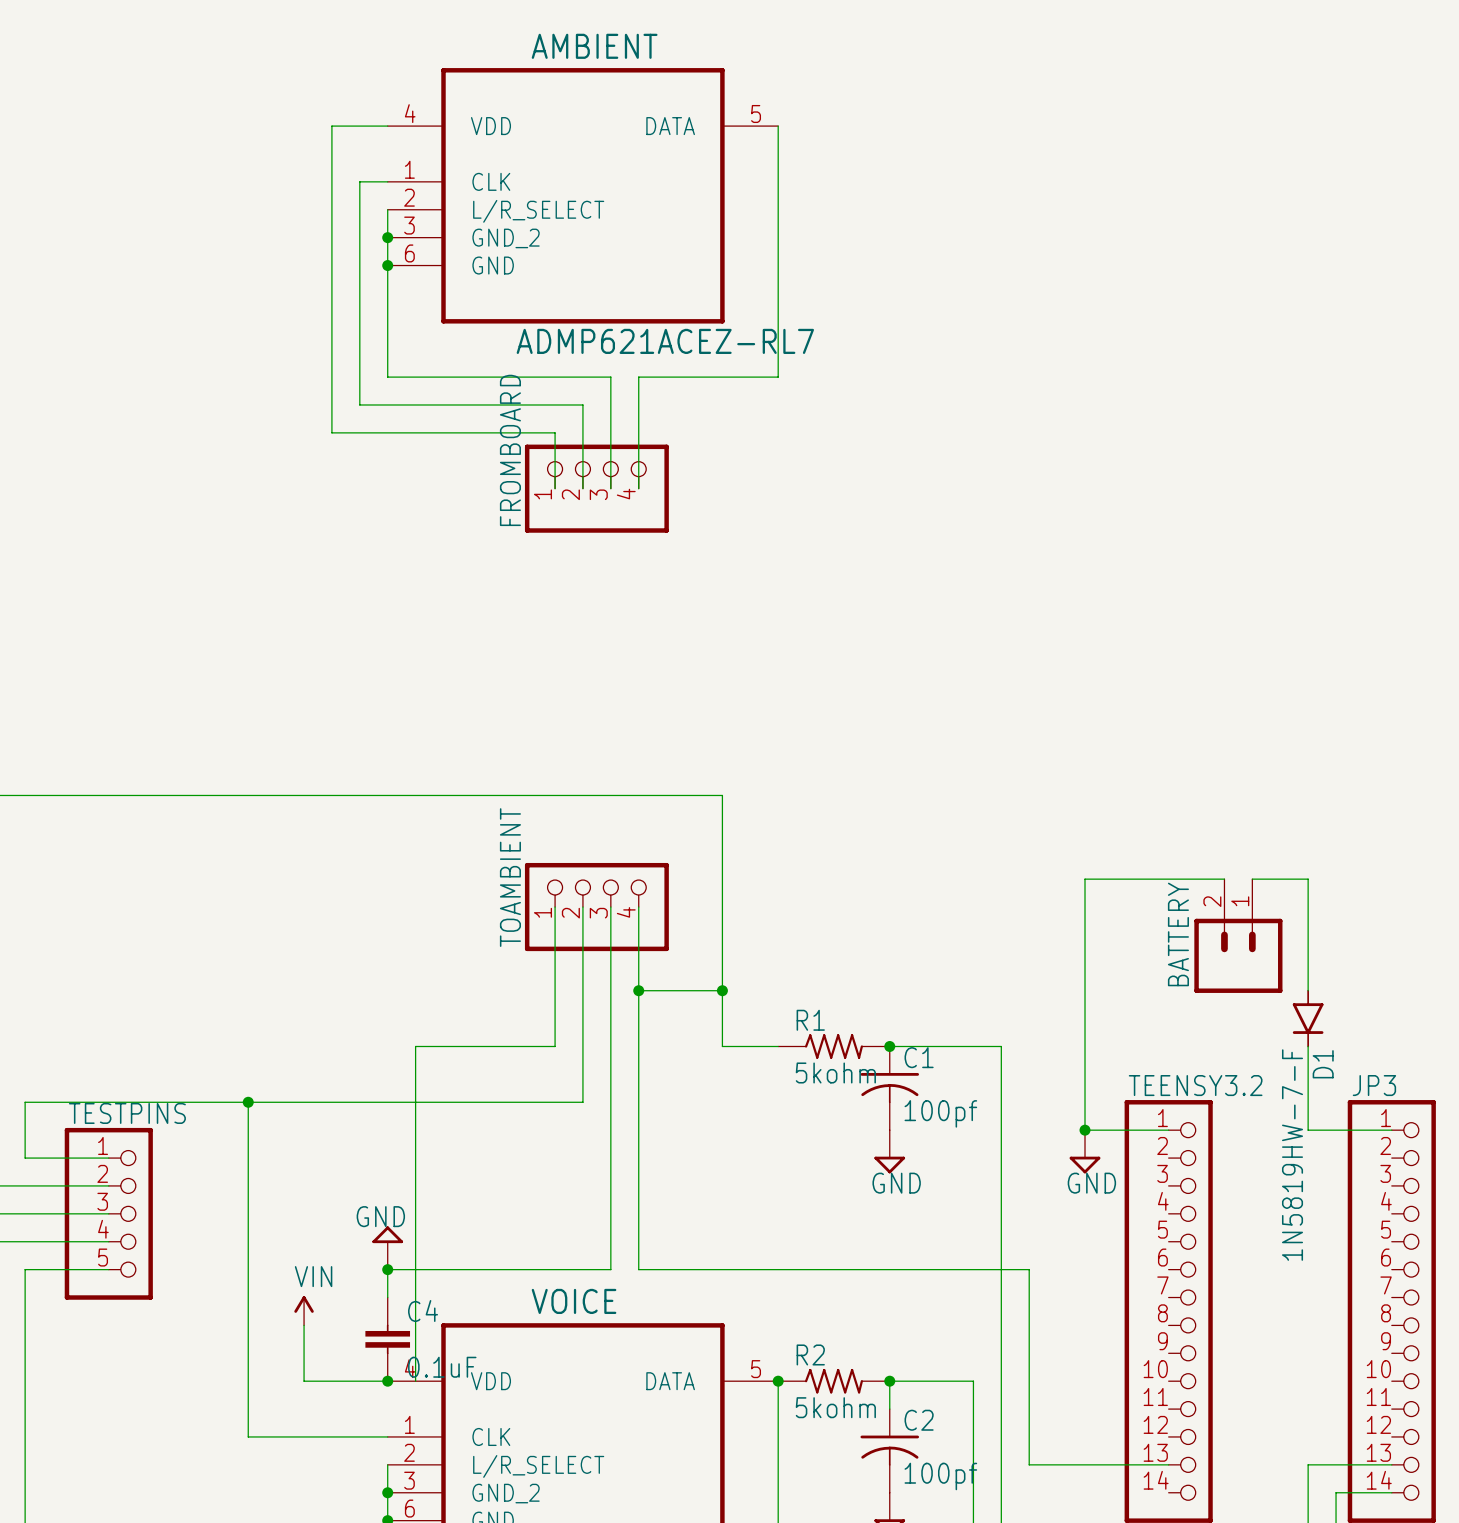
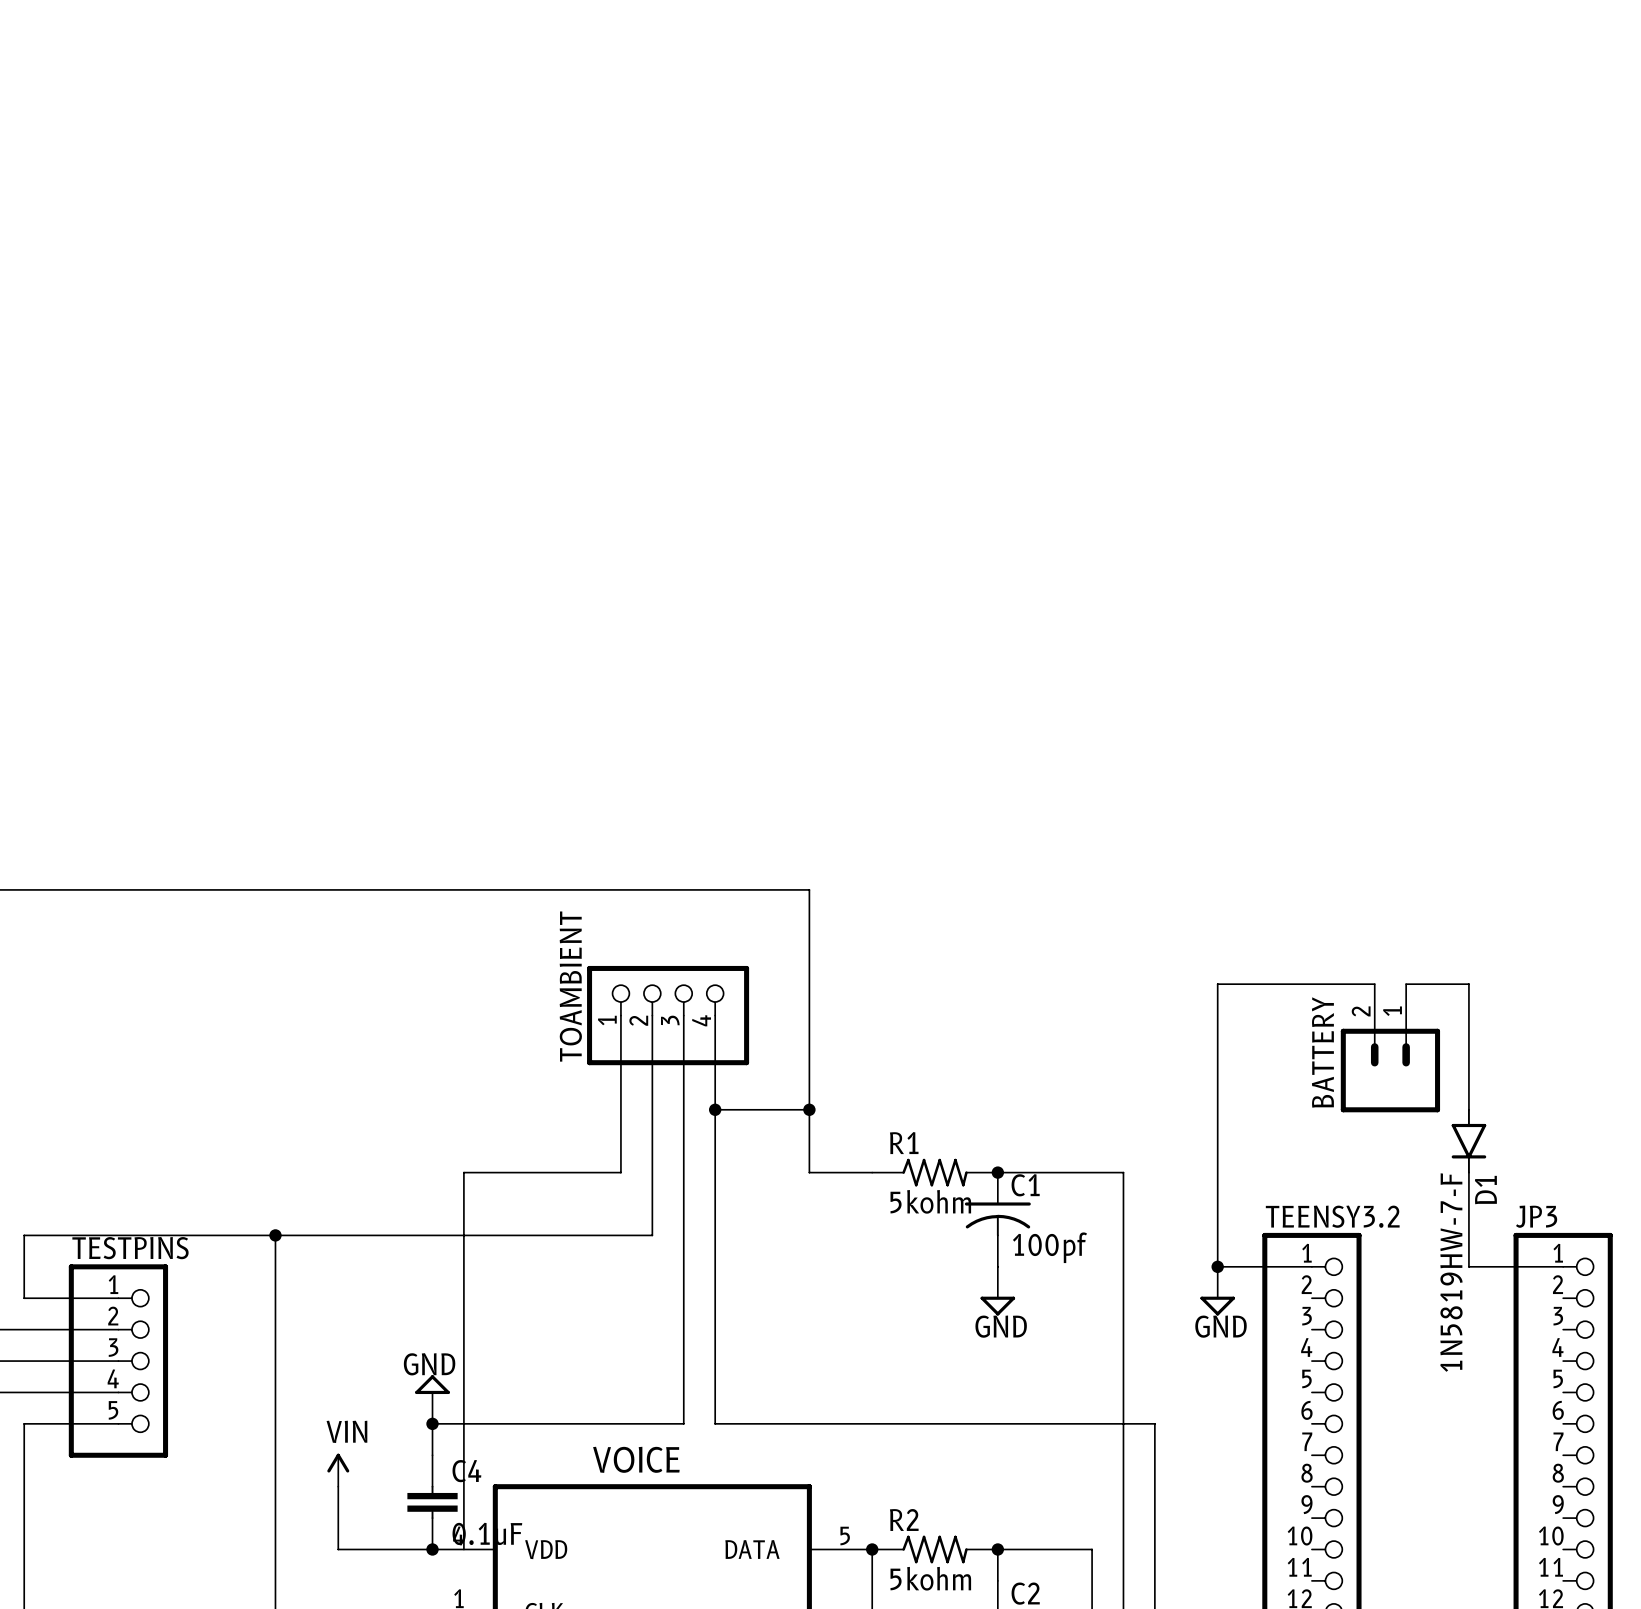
wire: (387, 126) (331, 126) (331, 432) (555, 432) (555, 488) -> none
wire: (778, 126) (778, 377) (638, 377) (638, 488) -> none
wire: (387, 181) (359, 181) (359, 404) (582, 404) (582, 488) -> none
AMBIENT: ADMP621ACEZ-RL7 (582, 195) -> none
wire: (387, 209) (387, 377) (610, 377) (610, 488) -> none
junction: (387, 237) -> none
junction: (387, 265) -> none
FROMBOARD: (596, 488) -> none

